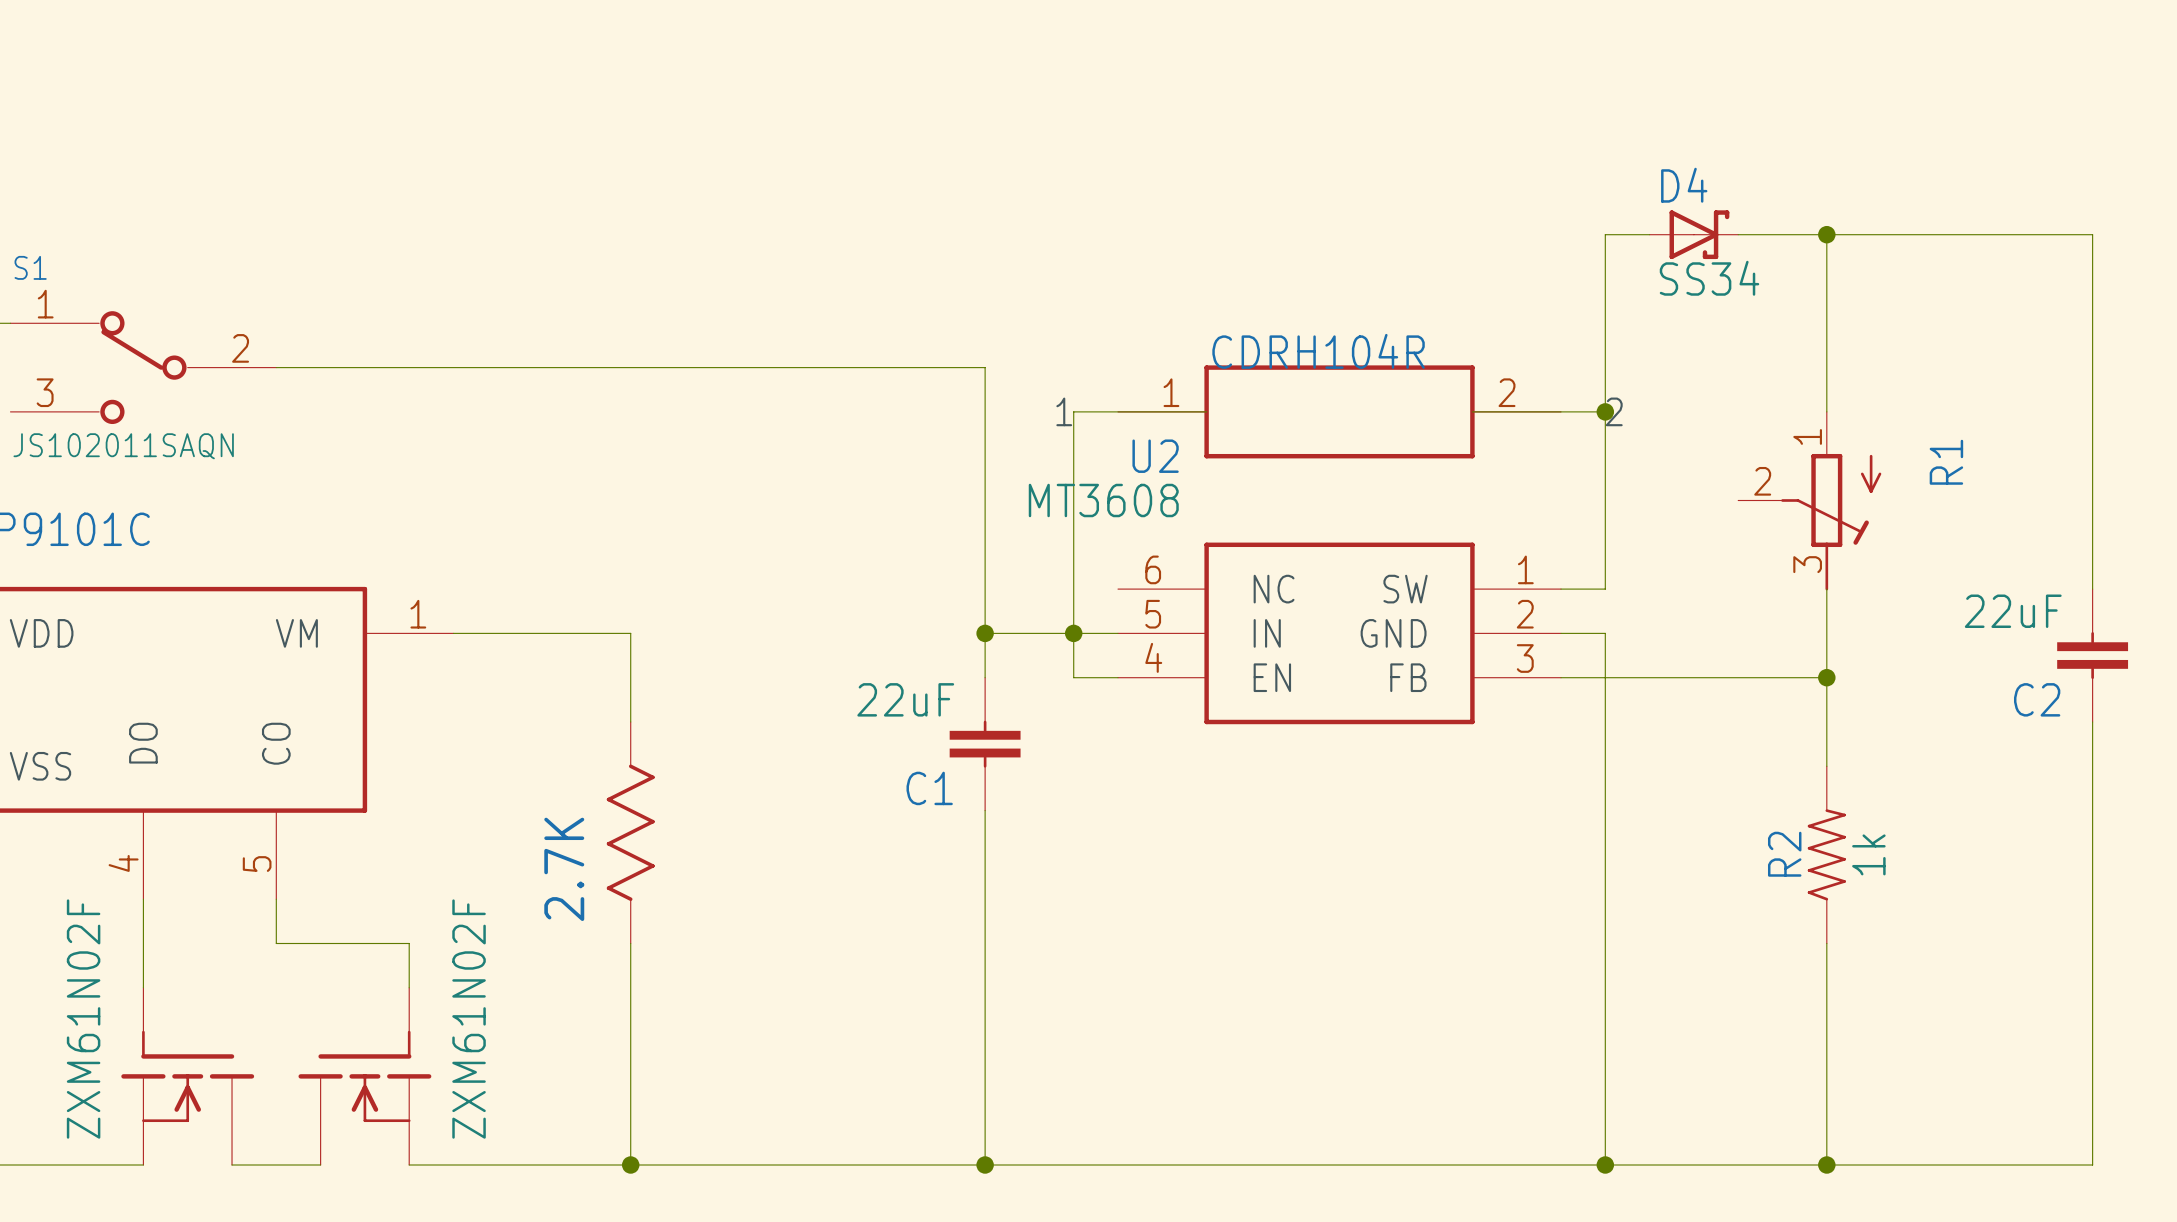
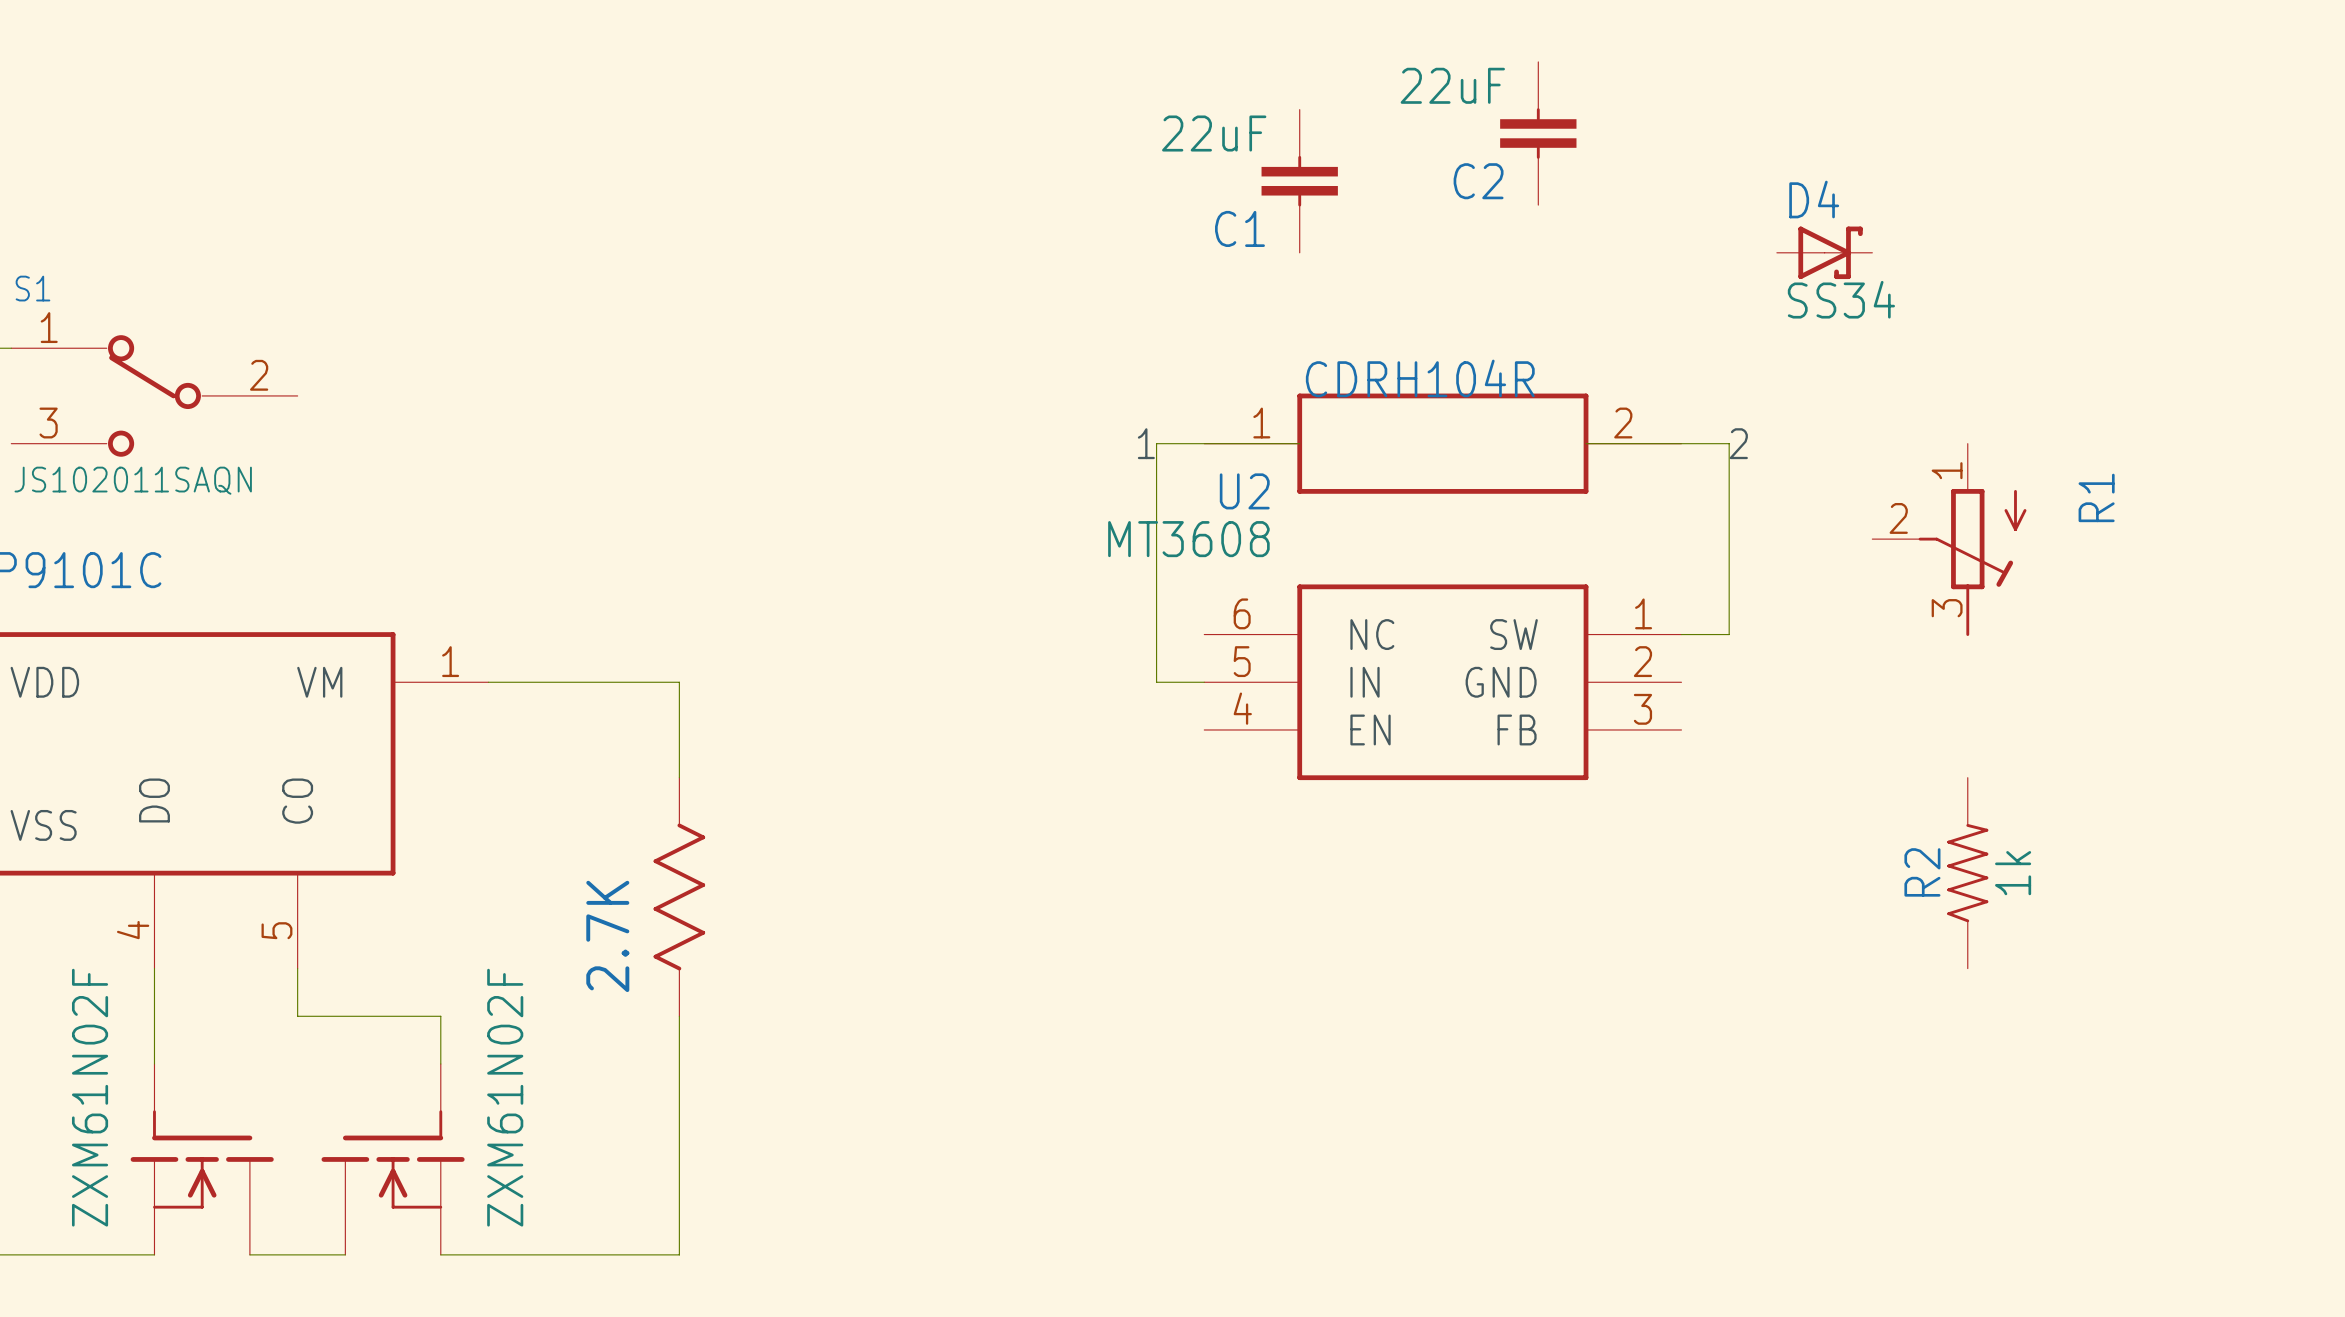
wire: (1649, 234) (1605, 234) (1605, 411) -> none
wire: (1738, 234) (2092, 234) (2092, 589) -> none
wire: (1826, 234) (1826, 411) -> none
junction: (1826, 234) -> none
wire: (276, 367) (985, 367) (985, 677) -> none
junction: (1605, 411) -> none
wire: (1826, 589) (1826, 766) -> none
wire: (985, 633) (1073, 633) (1073, 677) (1118, 677) -> none
junction: (985, 633) -> none
junction: (1073, 633) -> none
wire: (1561, 633) (1605, 633) (1605, 1164) -> none
C2 position: (2092, 655) -> (1538, 133)
wire: (1561, 677) (1826, 677) -> none
junction: (1826, 677) -> none
wire: (2092, 721) (2092, 1164) (630, 1164) -> none
C1 position: (985, 744) -> (1299, 181)
wire: (985, 810) (985, 1164) -> none
R2 position: (1826, 854) -> (1967, 873)
wire: (1826, 943) (1826, 1164) -> none
junction: (630, 1164) -> none
junction: (985, 1164) -> none
junction: (1605, 1164) -> none
junction: (1826, 1164) -> none

